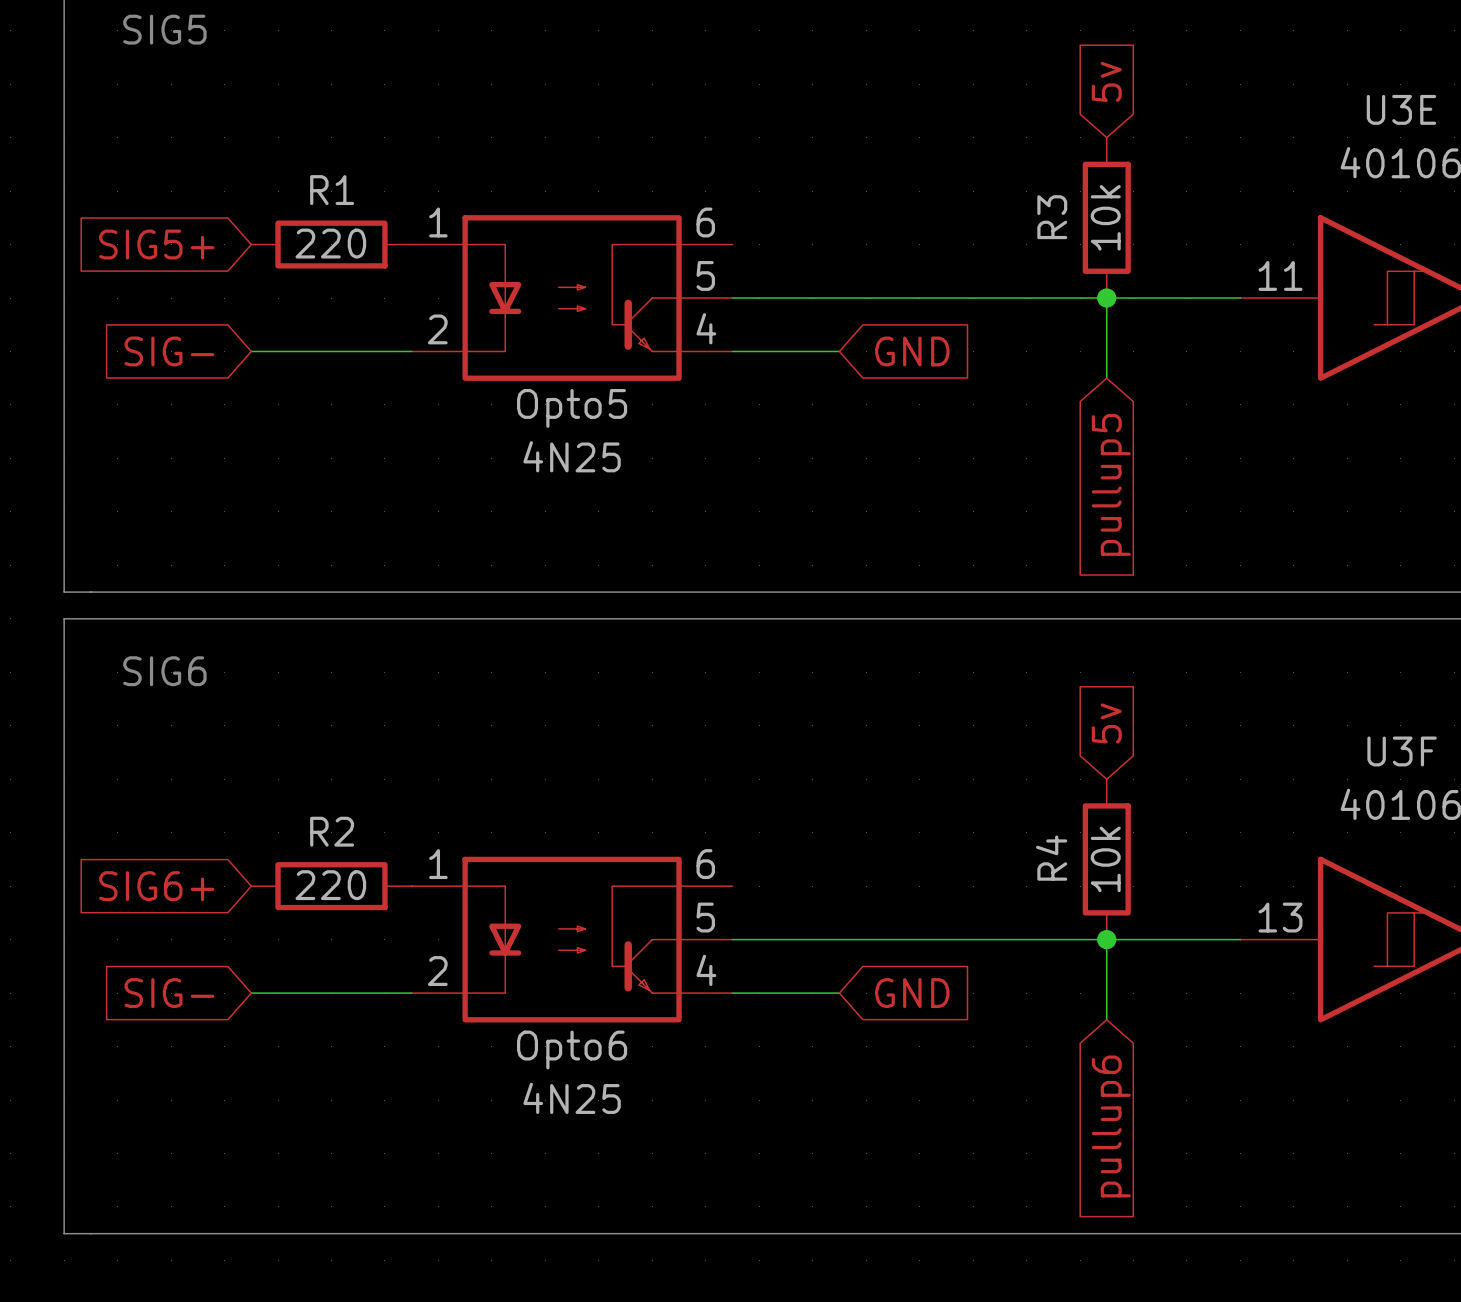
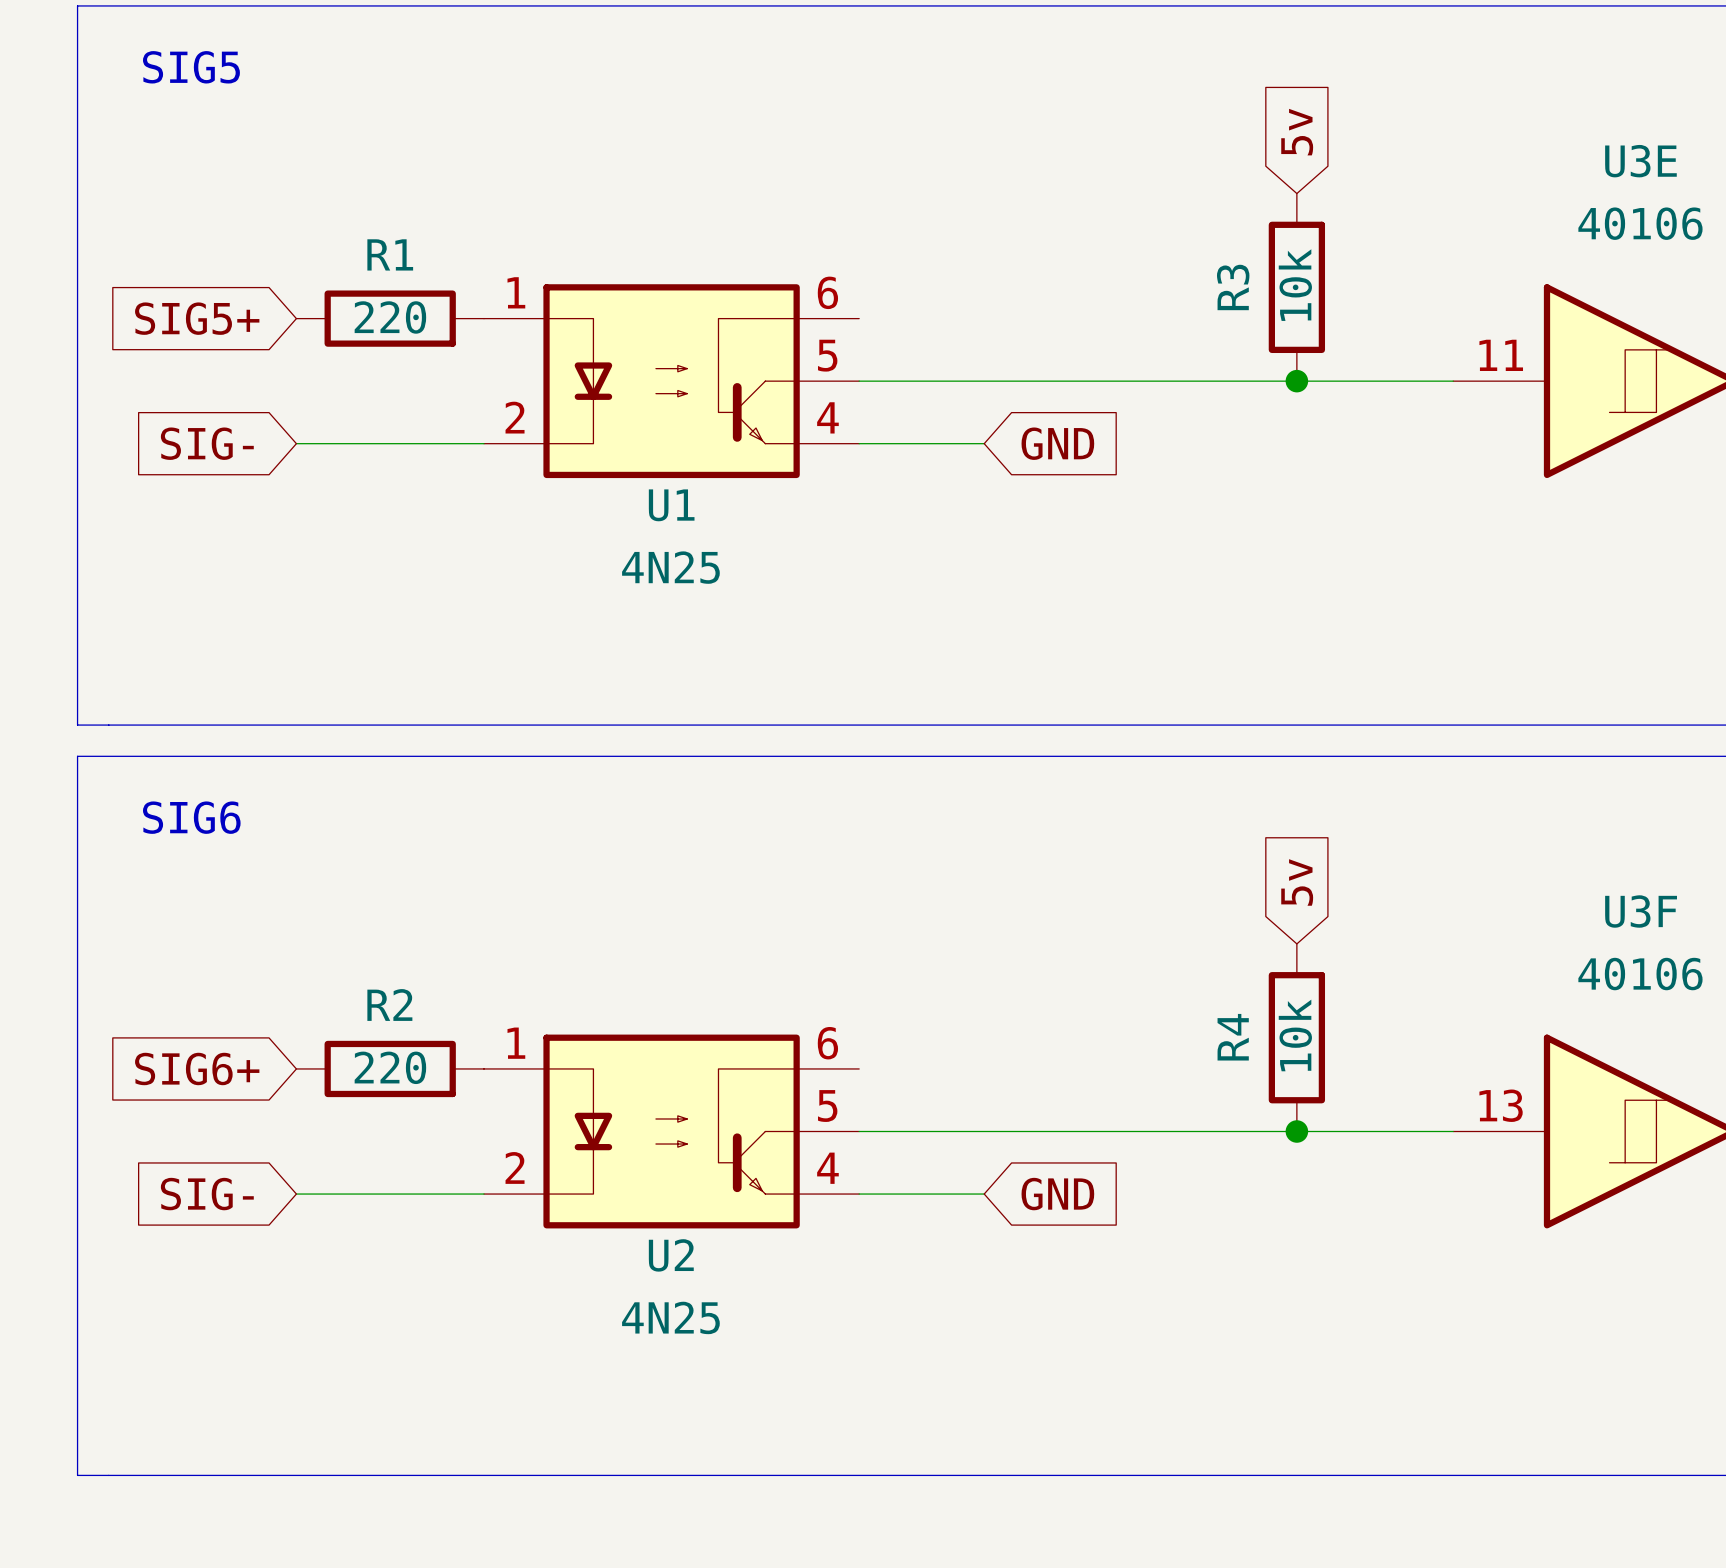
wire: (1106, 298) (1106, 378) -> none
Opto5 name: Opto5 (572, 408) -> U1 (671, 505)
global label: pullup5 (1111, 484) -> none
wire: (1106, 939) (1106, 1019) -> none
Opto6 name: Opto6 (572, 1050) -> U2 (671, 1255)
global label: pullup6 (1111, 1126) -> none

